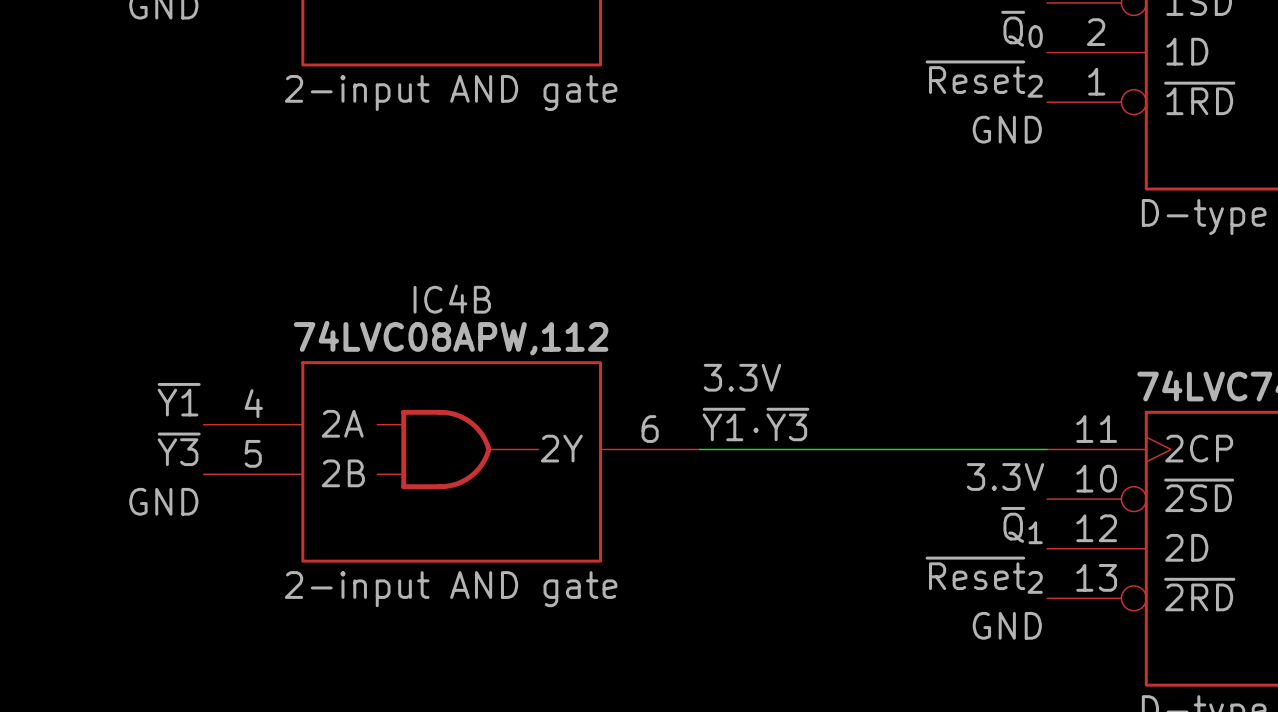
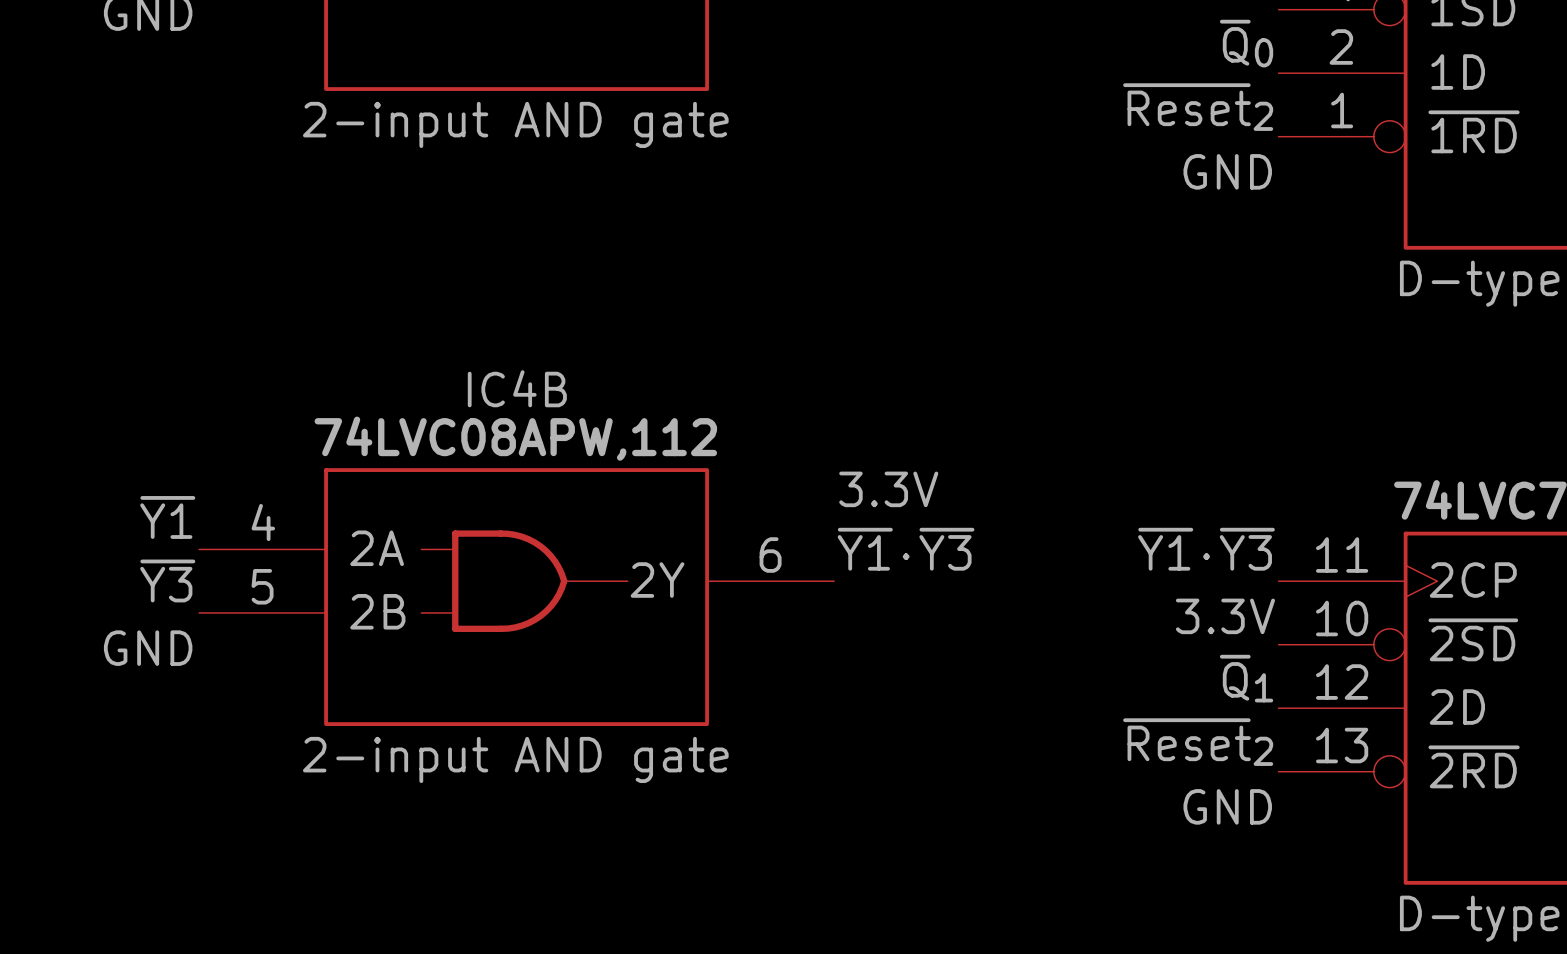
label: none -> ~{Y1}·~{Y3} (1206, 549)
wire: (699, 449) (1047, 449) -> none

